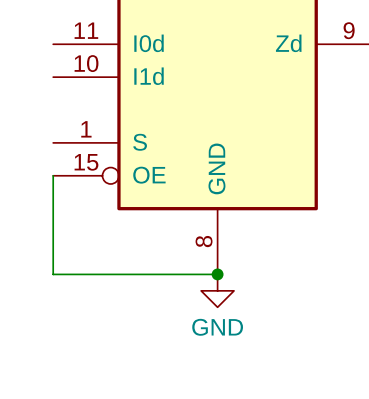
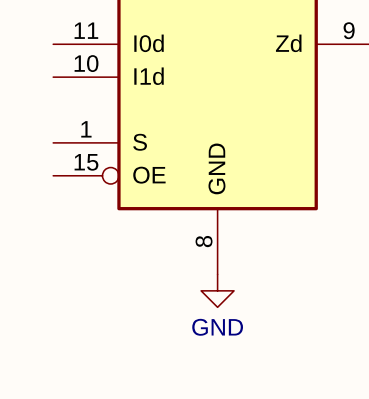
wire: (53, 175) (53, 274) (217, 274) -> none
junction: (217, 274) -> none

